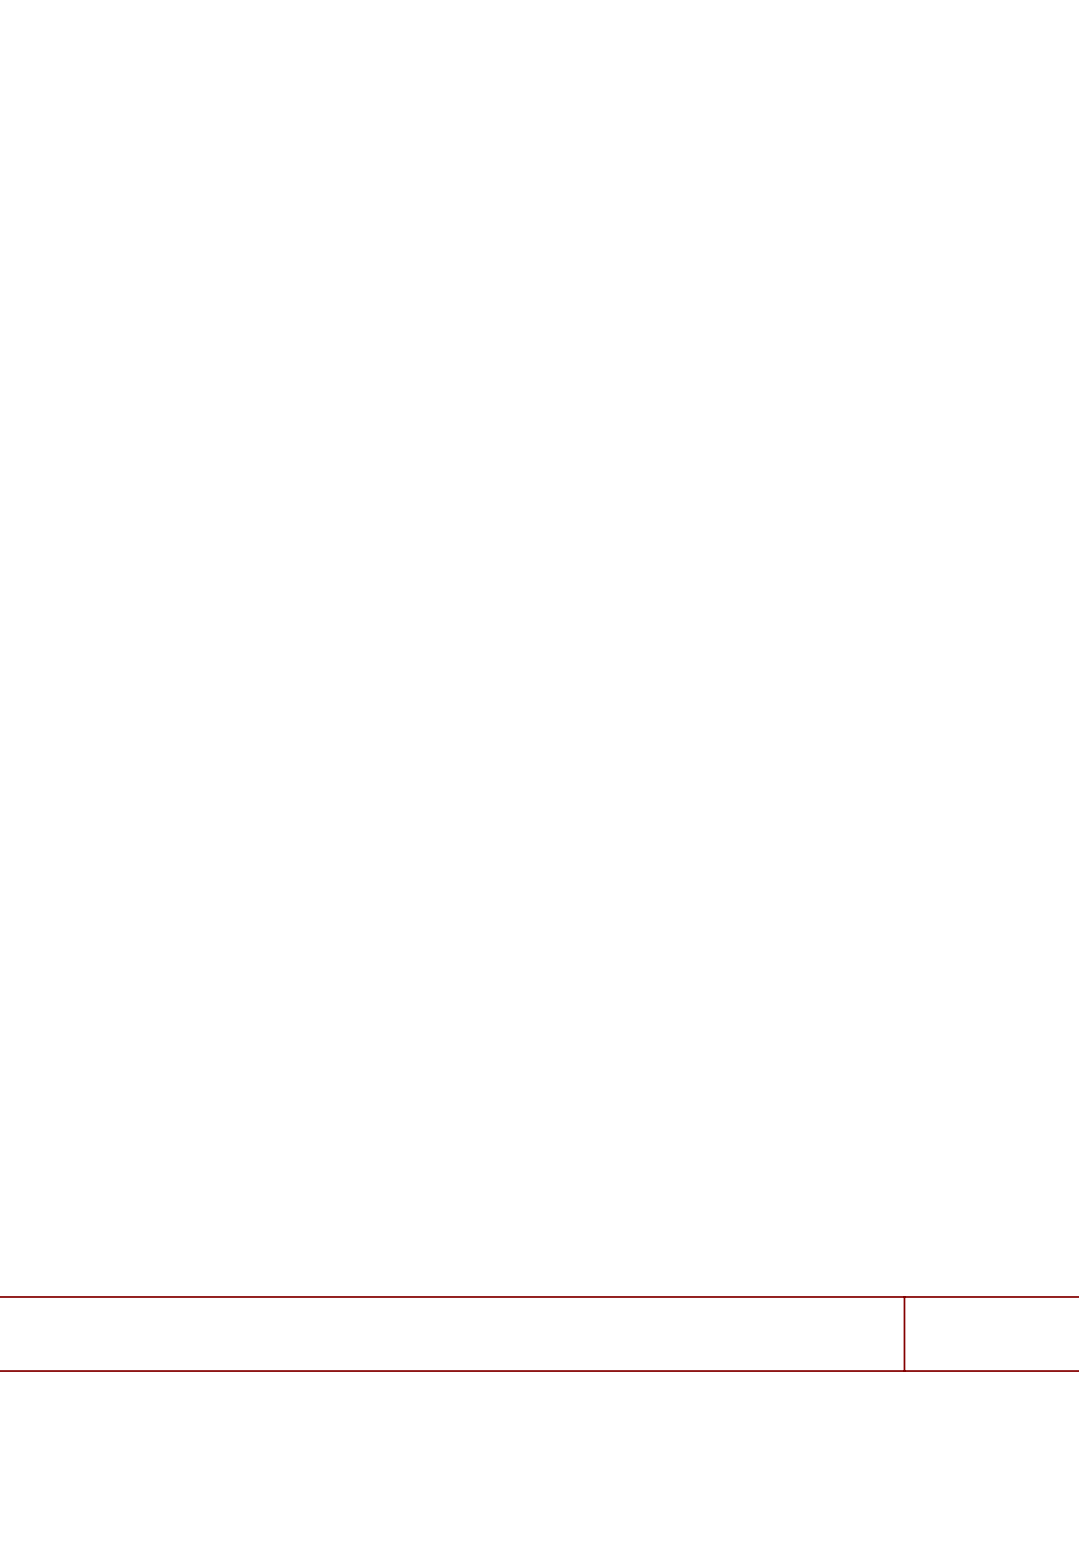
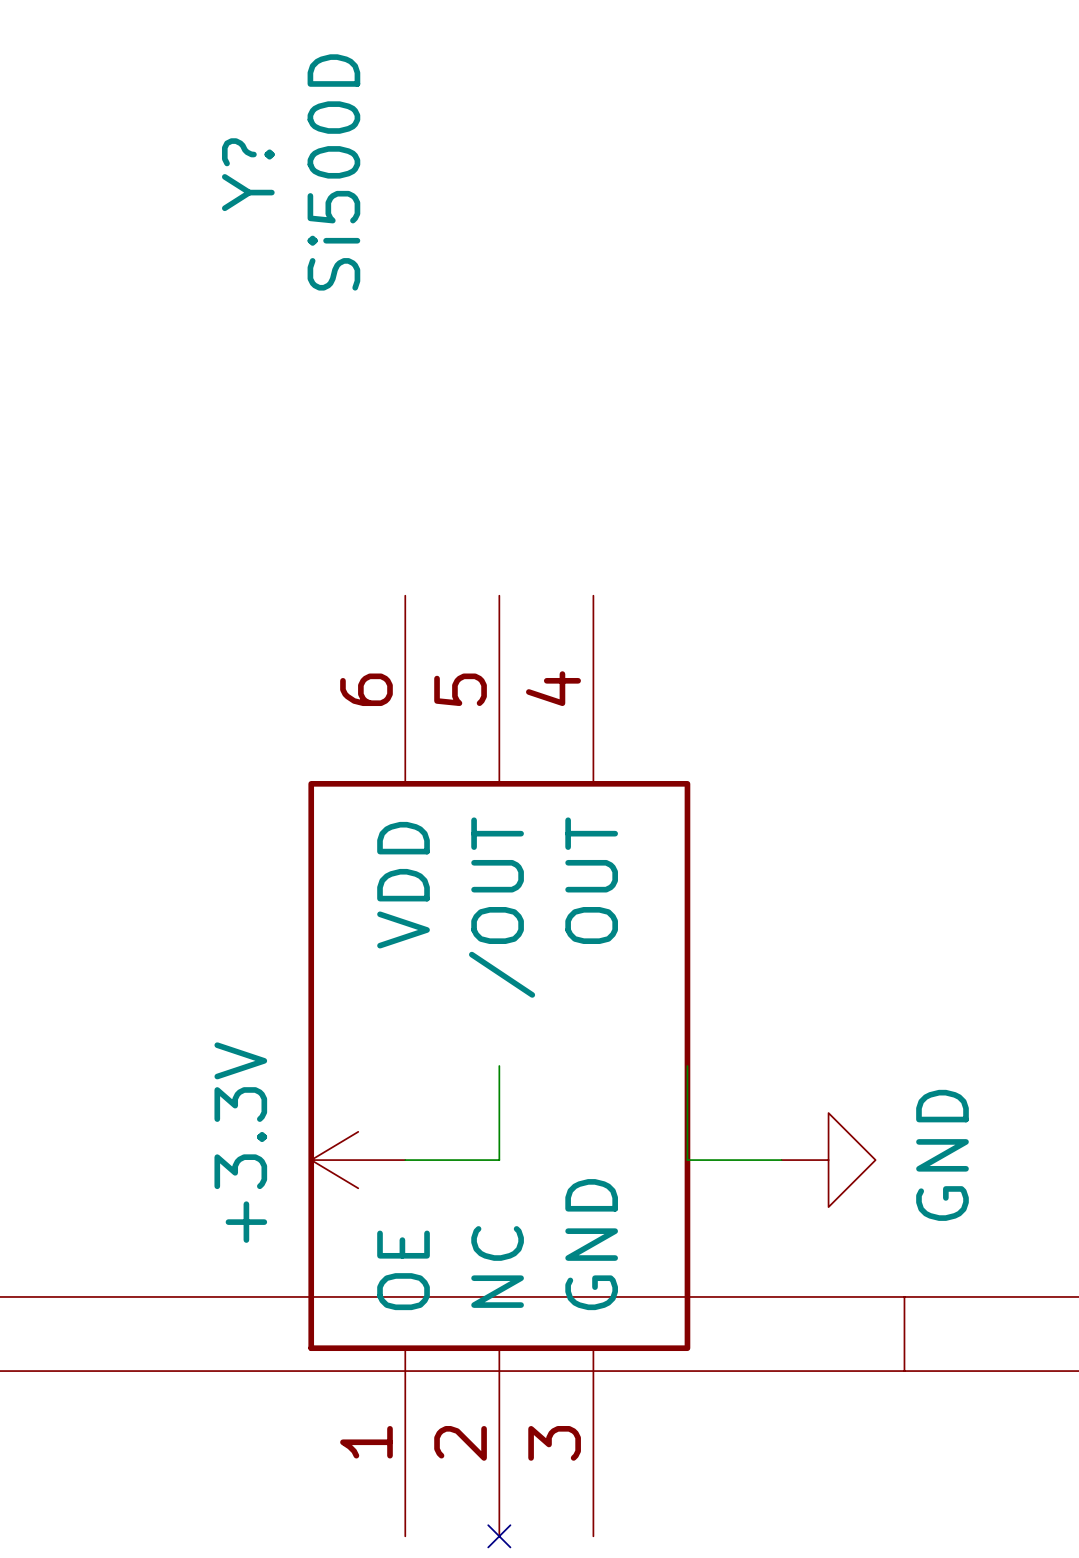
wire: none -> (499, 1066) (499, 1160) (405, 1160)
wire: none -> (687, 1066) (687, 1160) (781, 1160)
Y?: none -> Si500D (499, 1071)
power symbol: none -> +3.3V (358, 1160)
power symbol: none -> GND (828, 1160)

